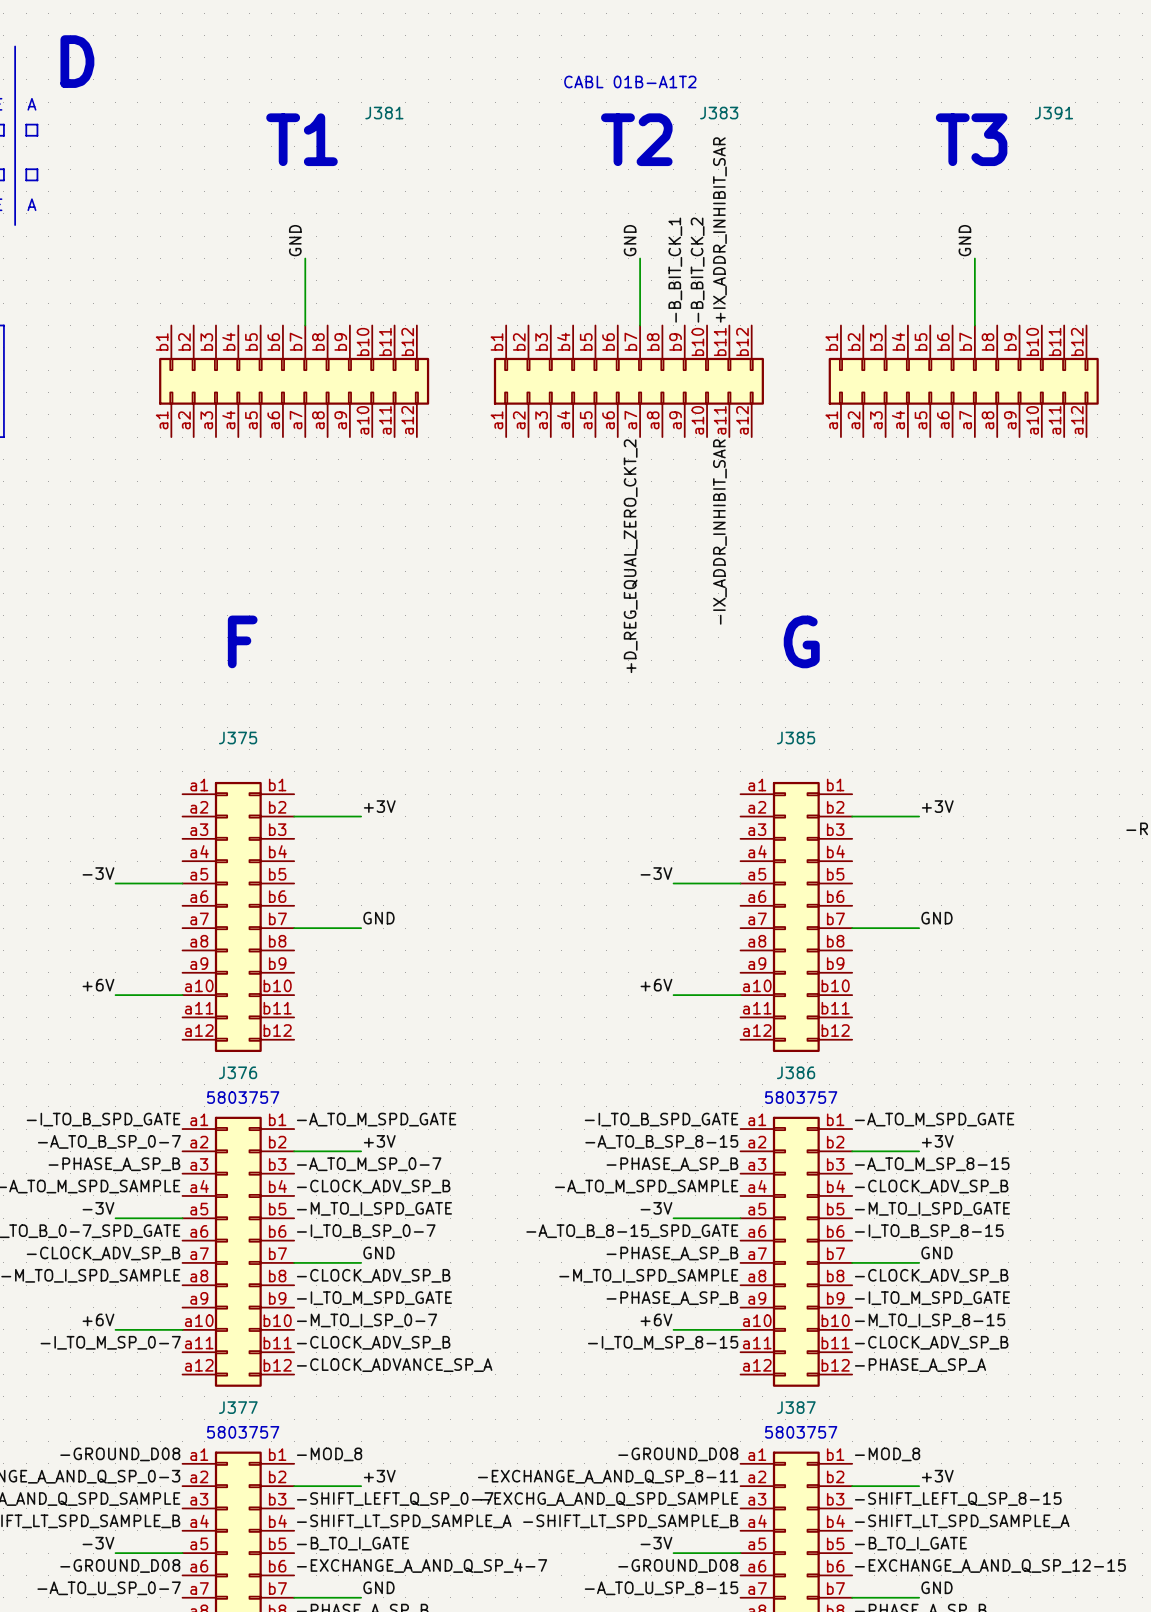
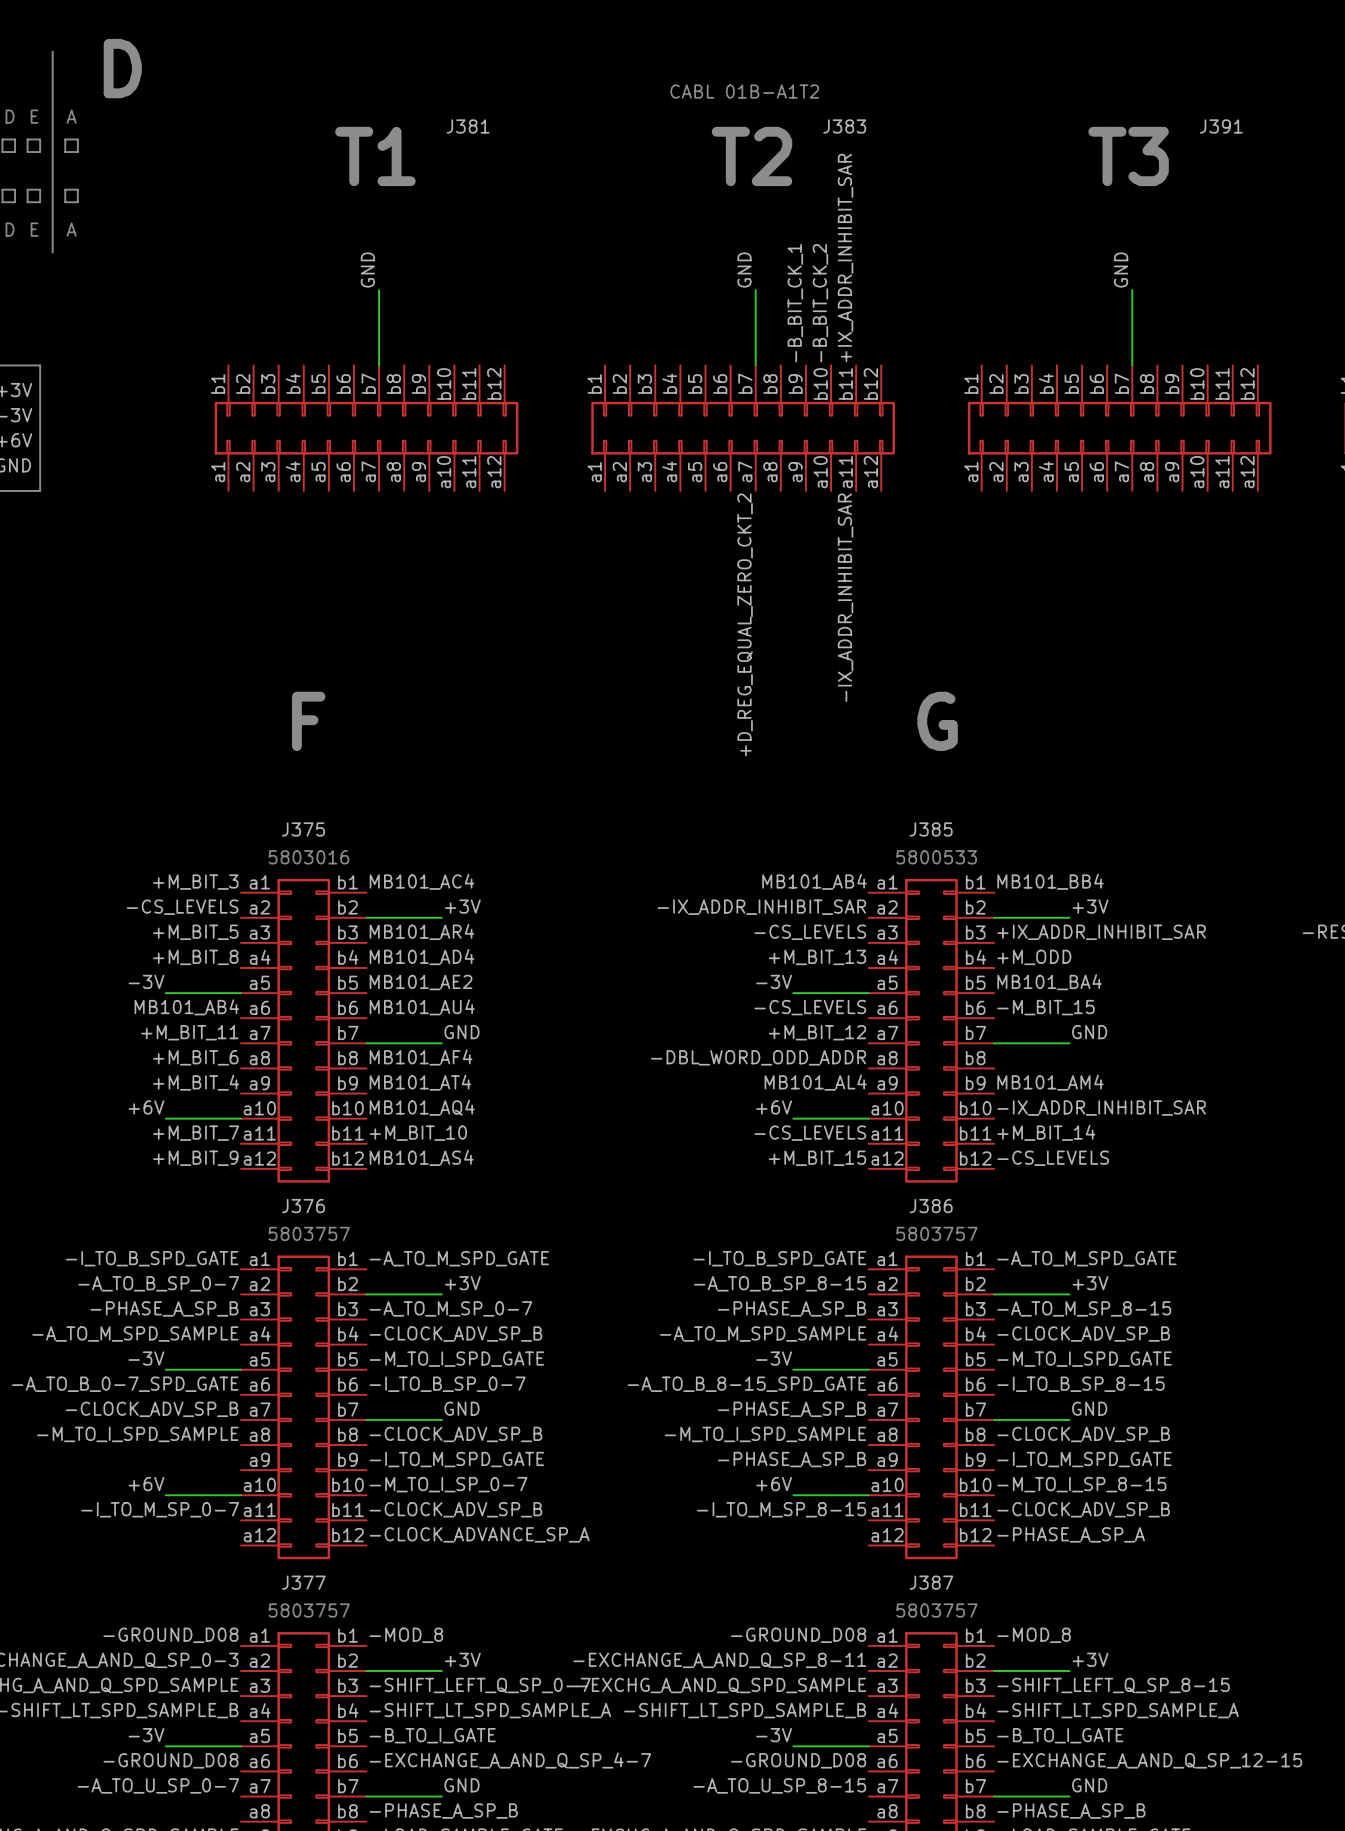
text: none -> 5803016 (308, 857)
text: none -> 5800533 (936, 857)
label: none -> +M_BIT_3 (195, 882)
label: none -> MB101_AC4 (421, 881)
label: none -> MB101_AB4 (814, 881)
label: none -> MB101_BB4 (1050, 881)
label: none -> -CS_LEVELS (182, 907)
label: none -> -IX_ADDR_INHIBIT_SAR (761, 907)
label: none -> +M_BIT_5 (195, 932)
label: none -> MB101_AR4 (421, 932)
label: none -> -CS_LEVELS (810, 932)
label: none -> +IX_ADDR_INHIBIT_SAR (1101, 932)
label: none -> +M_BIT_8 (195, 957)
label: none -> MB101_AD4 (421, 957)
label: none -> +M_BIT_13 (817, 957)
label: none -> +M_ODD (1034, 957)
label: none -> MB101_BA4 (1049, 982)
label: none -> MB101_AE2 (421, 982)
label: none -> MB101_AB4 (186, 1007)
label: none -> MB101_AU4 (422, 1007)
label: none -> -CS_LEVELS (810, 1007)
label: none -> -M_BIT_15 (1046, 1007)
label: none -> +M_BIT_11 (189, 1032)
label: none -> +M_BIT_12 (817, 1032)
label: none -> MB101_AF4 (421, 1057)
label: none -> +M_BIT_6 (195, 1057)
label: none -> -DBL_WORD_ODD_ADDR (758, 1057)
label: none -> +M_BIT_4 (196, 1082)
label: none -> MB101_AT4 (420, 1082)
label: none -> MB101_AL4 (815, 1082)
label: none -> MB101_AM4 (1050, 1082)
label: none -> MB101_AQ4 (422, 1107)
label: none -> -IX_ADDR_INHIBIT_SAR (1101, 1108)
label: none -> +M_BIT_7 (196, 1133)
label: none -> +M_BIT_10 (418, 1133)
label: none -> -CS_LEVELS (810, 1133)
label: none -> +M_BIT_14 (1046, 1132)
label: none -> +M_BIT_9 (195, 1158)
label: none -> MB101_AS4 (421, 1157)
label: none -> +M_BIT_15 (817, 1158)
label: none -> -CS_LEVELS (1053, 1158)

